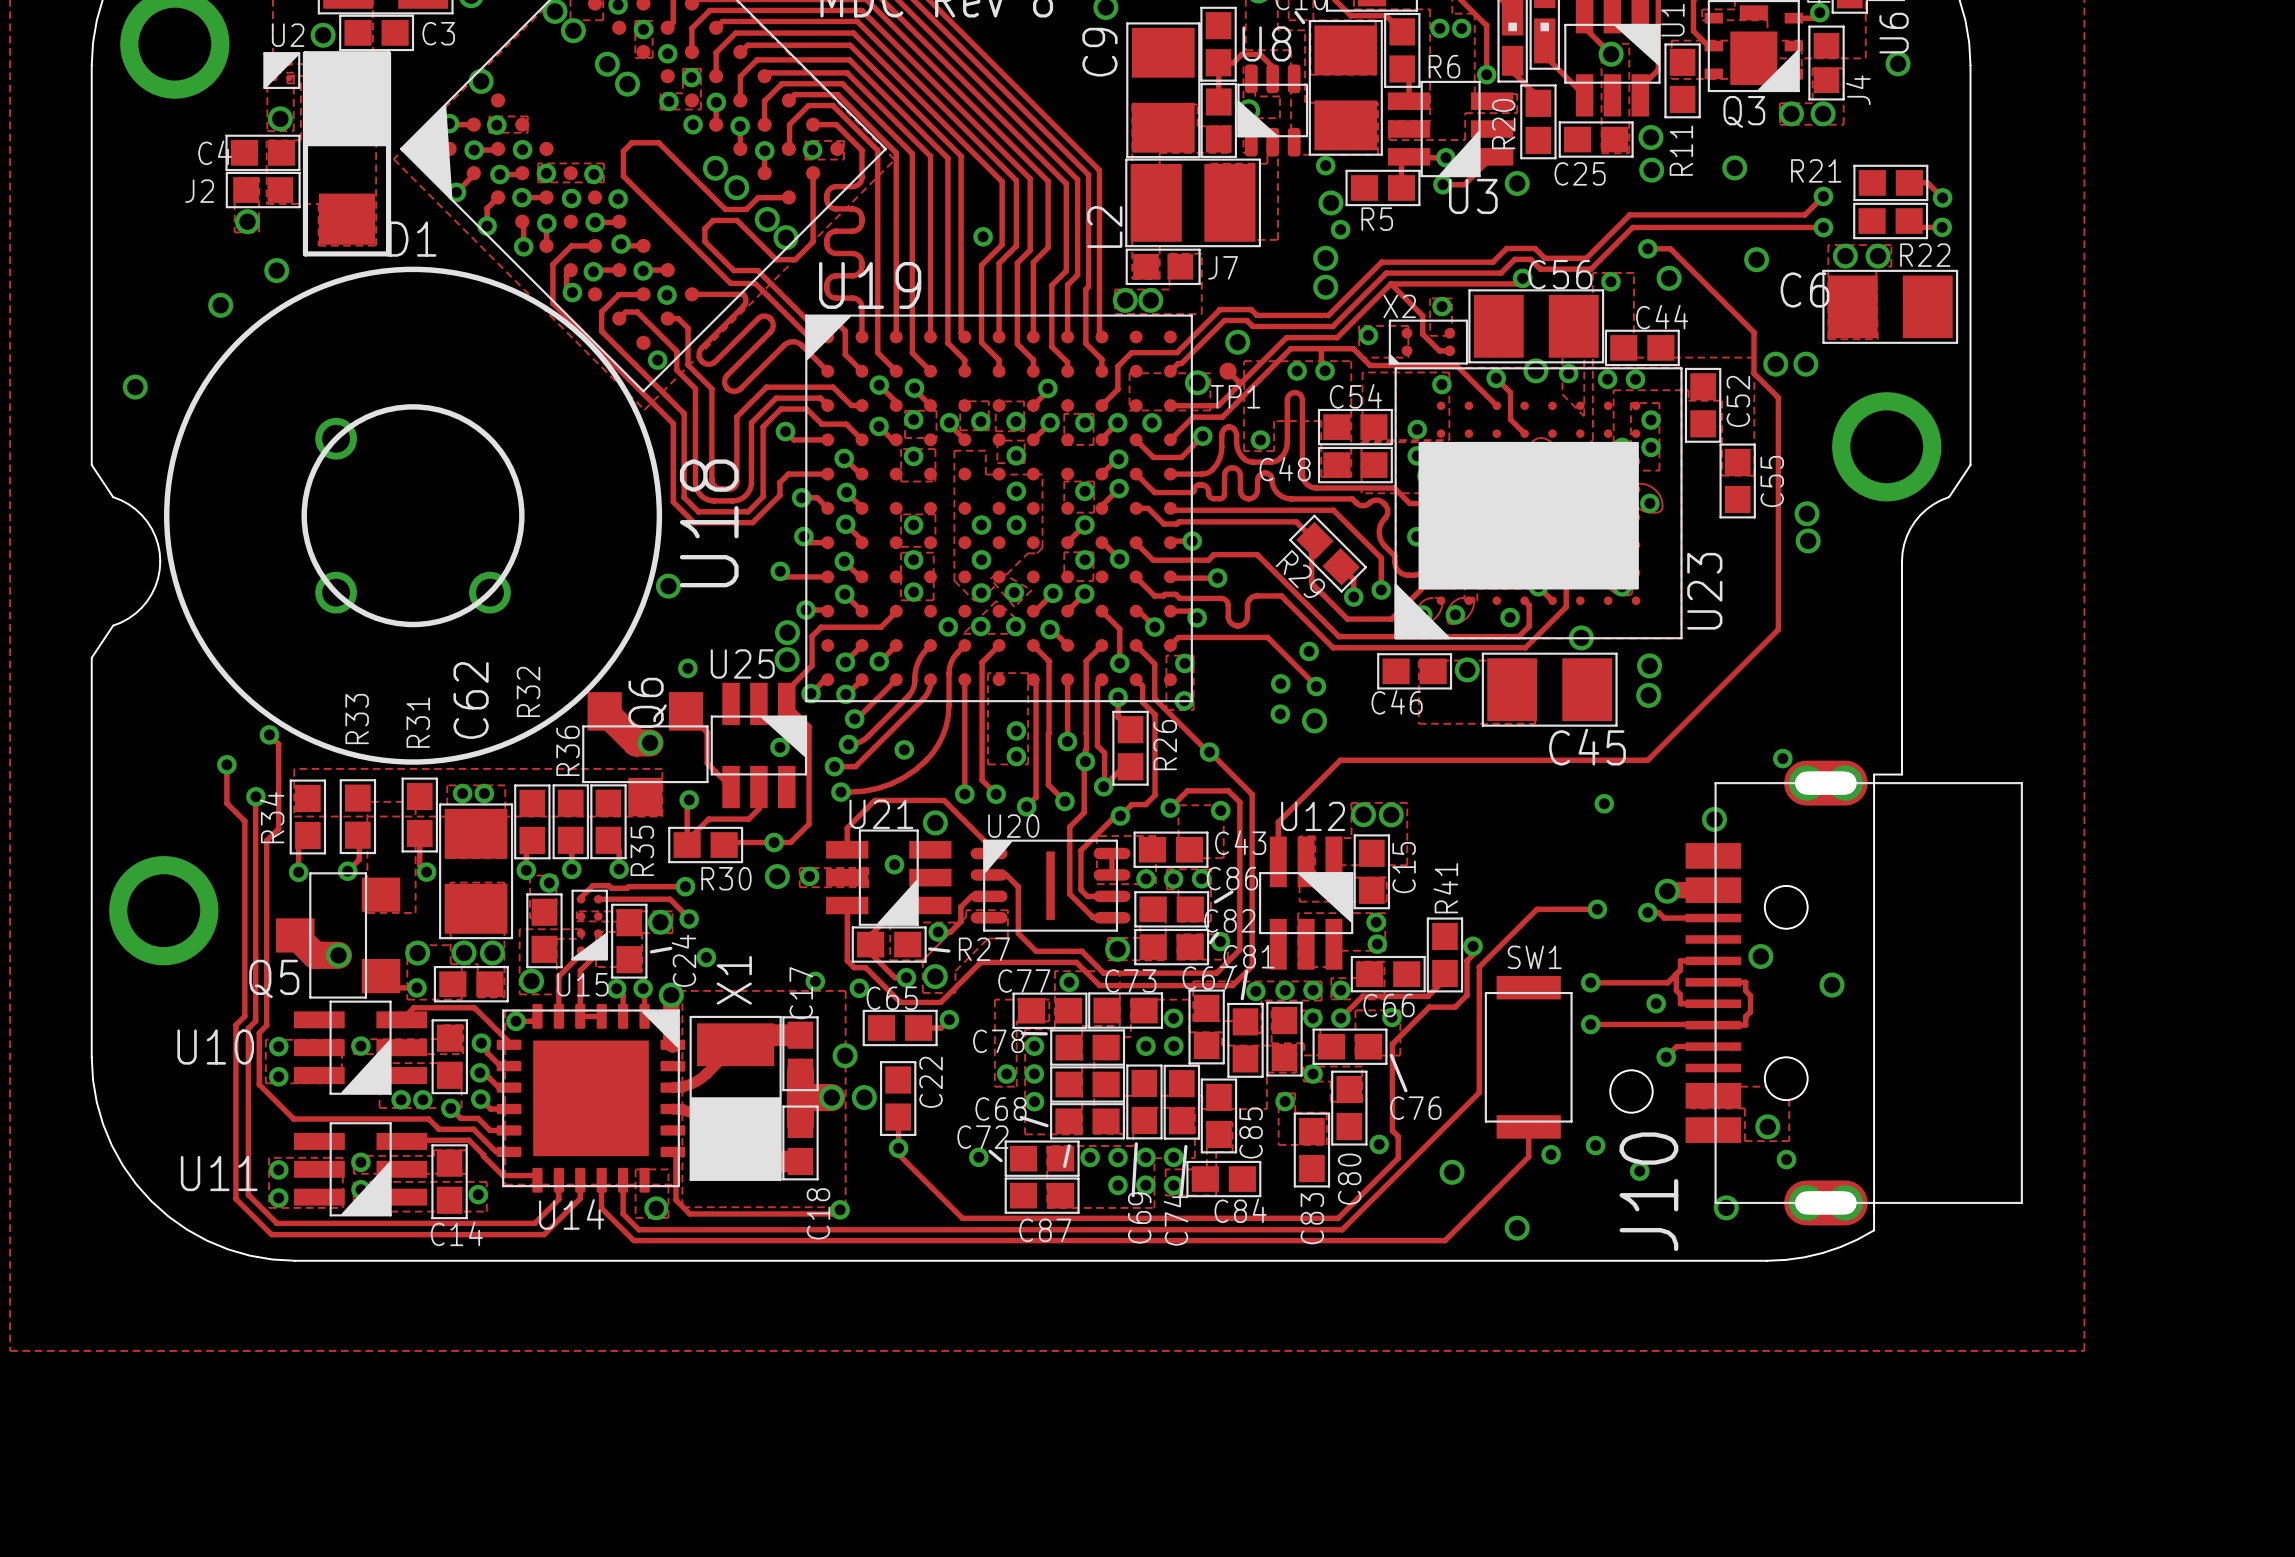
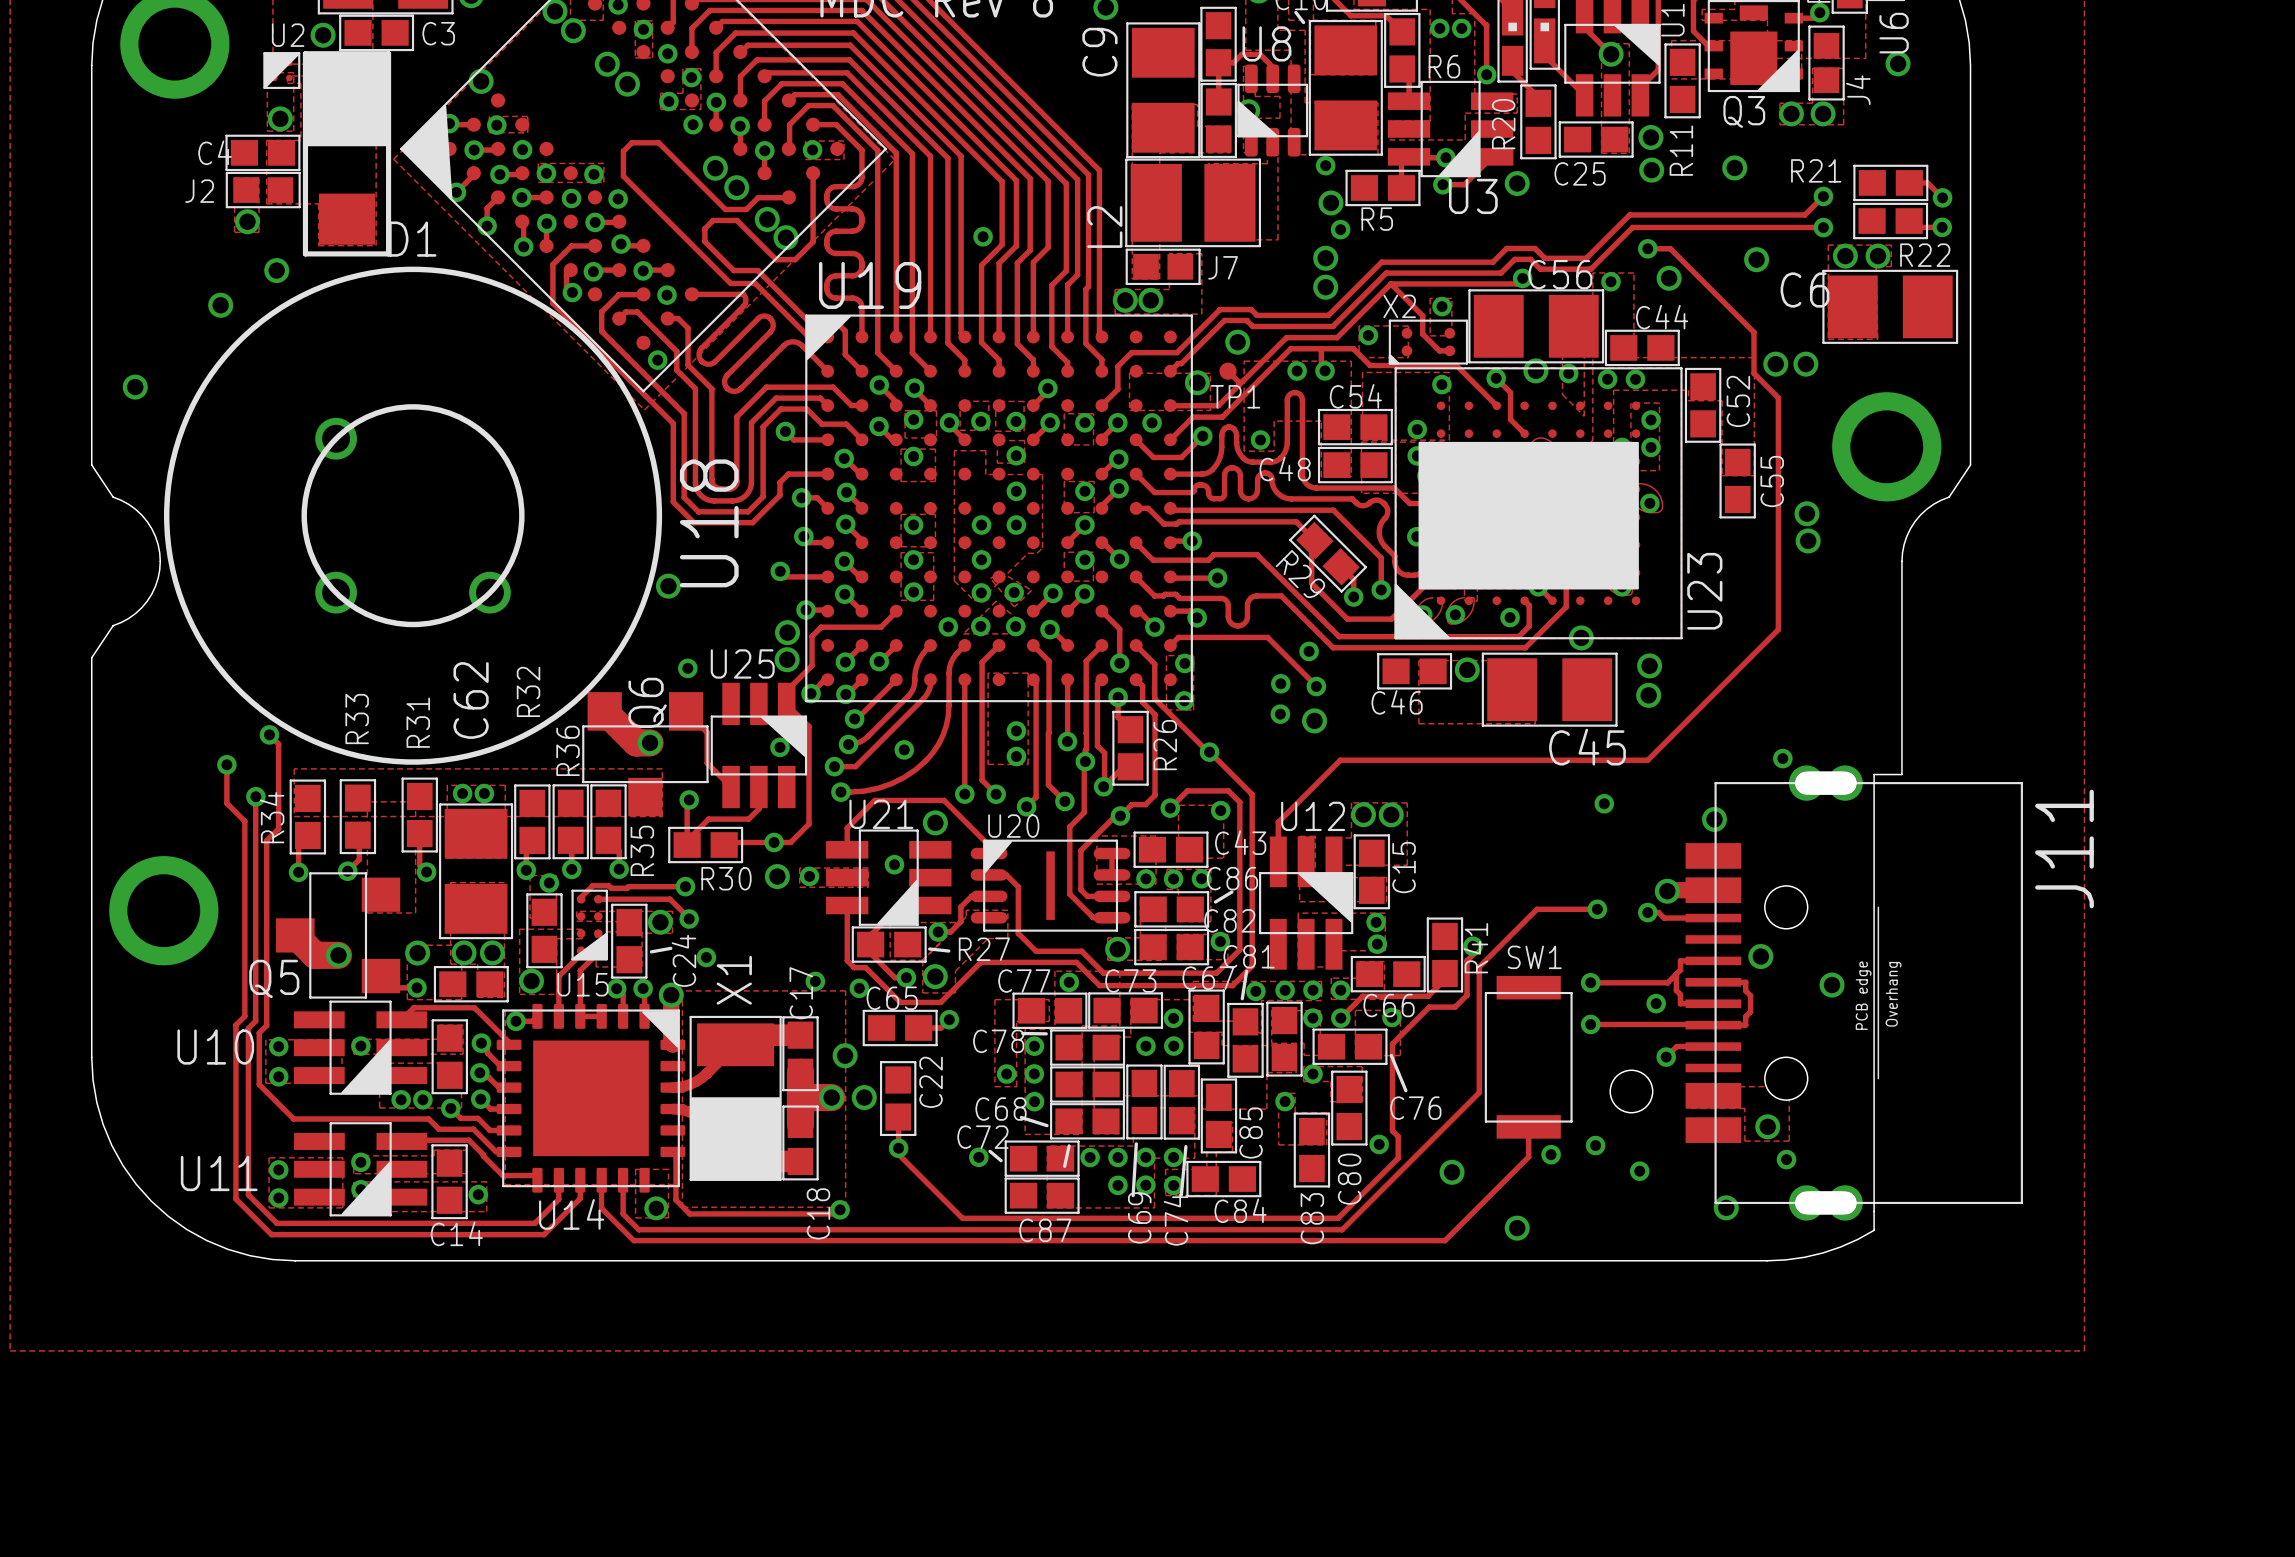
R41 name position: R41 (1445, 888) -> R41 (1475, 948)
line: (1217, 933) (1210, 942) -> none
J10: (1854, 993) -> none
J11: none -> (1854, 993)

